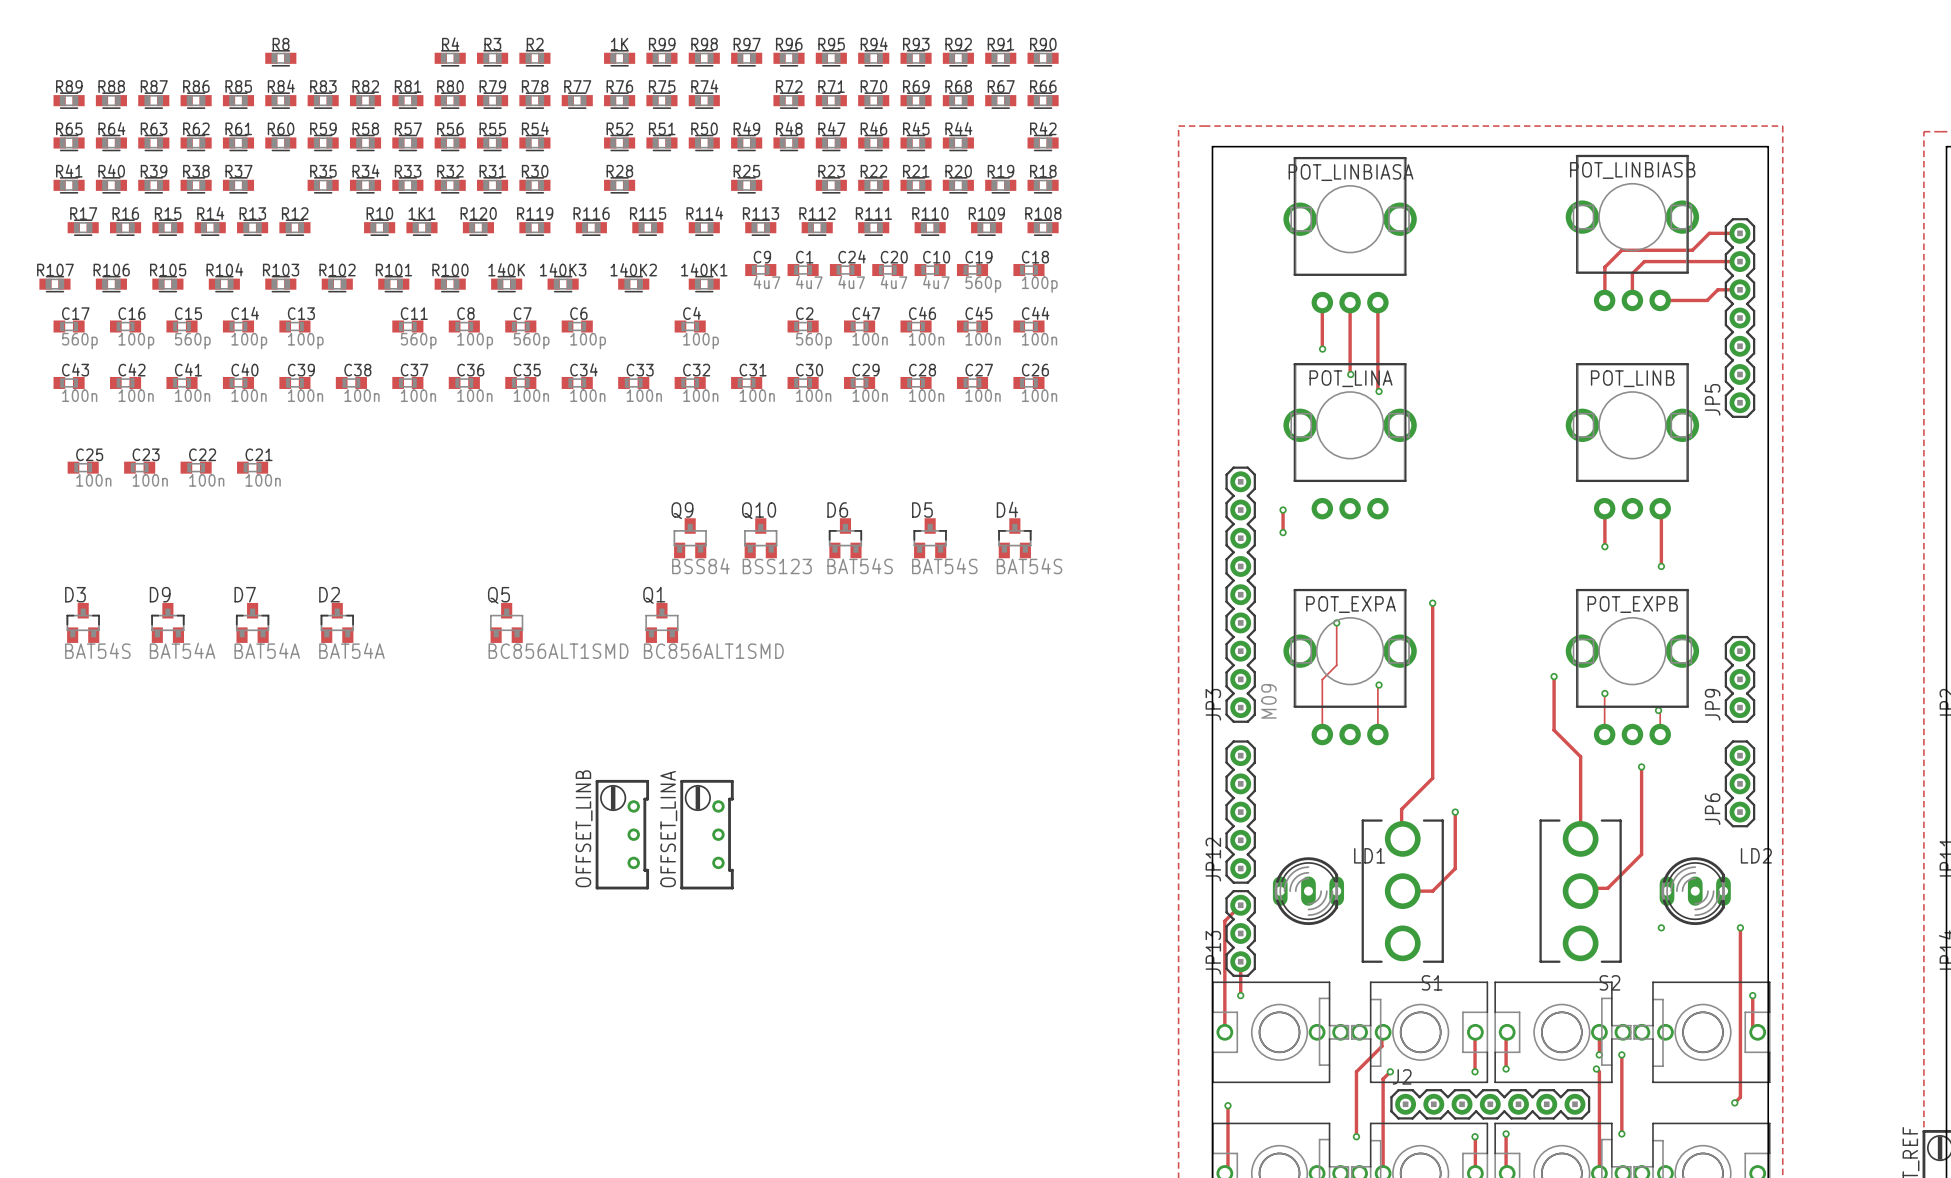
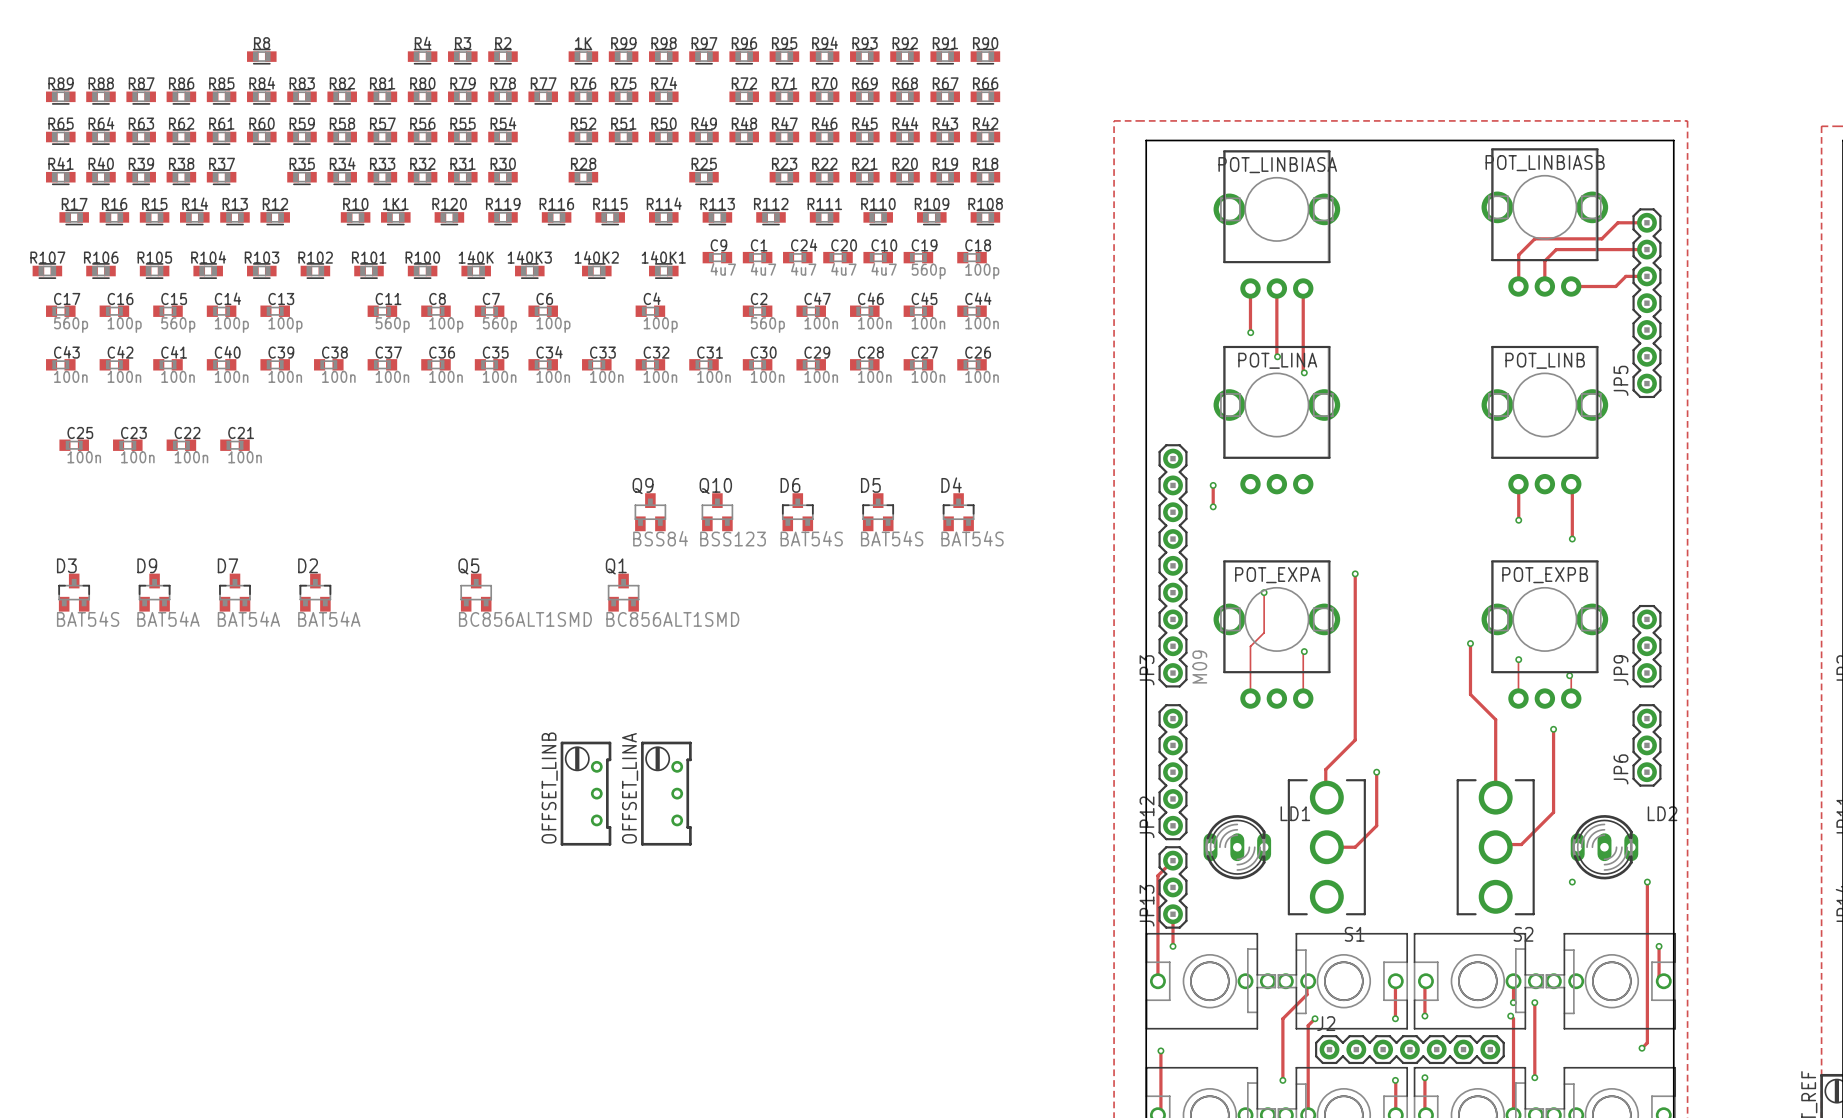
R43: none -> (945, 137)

